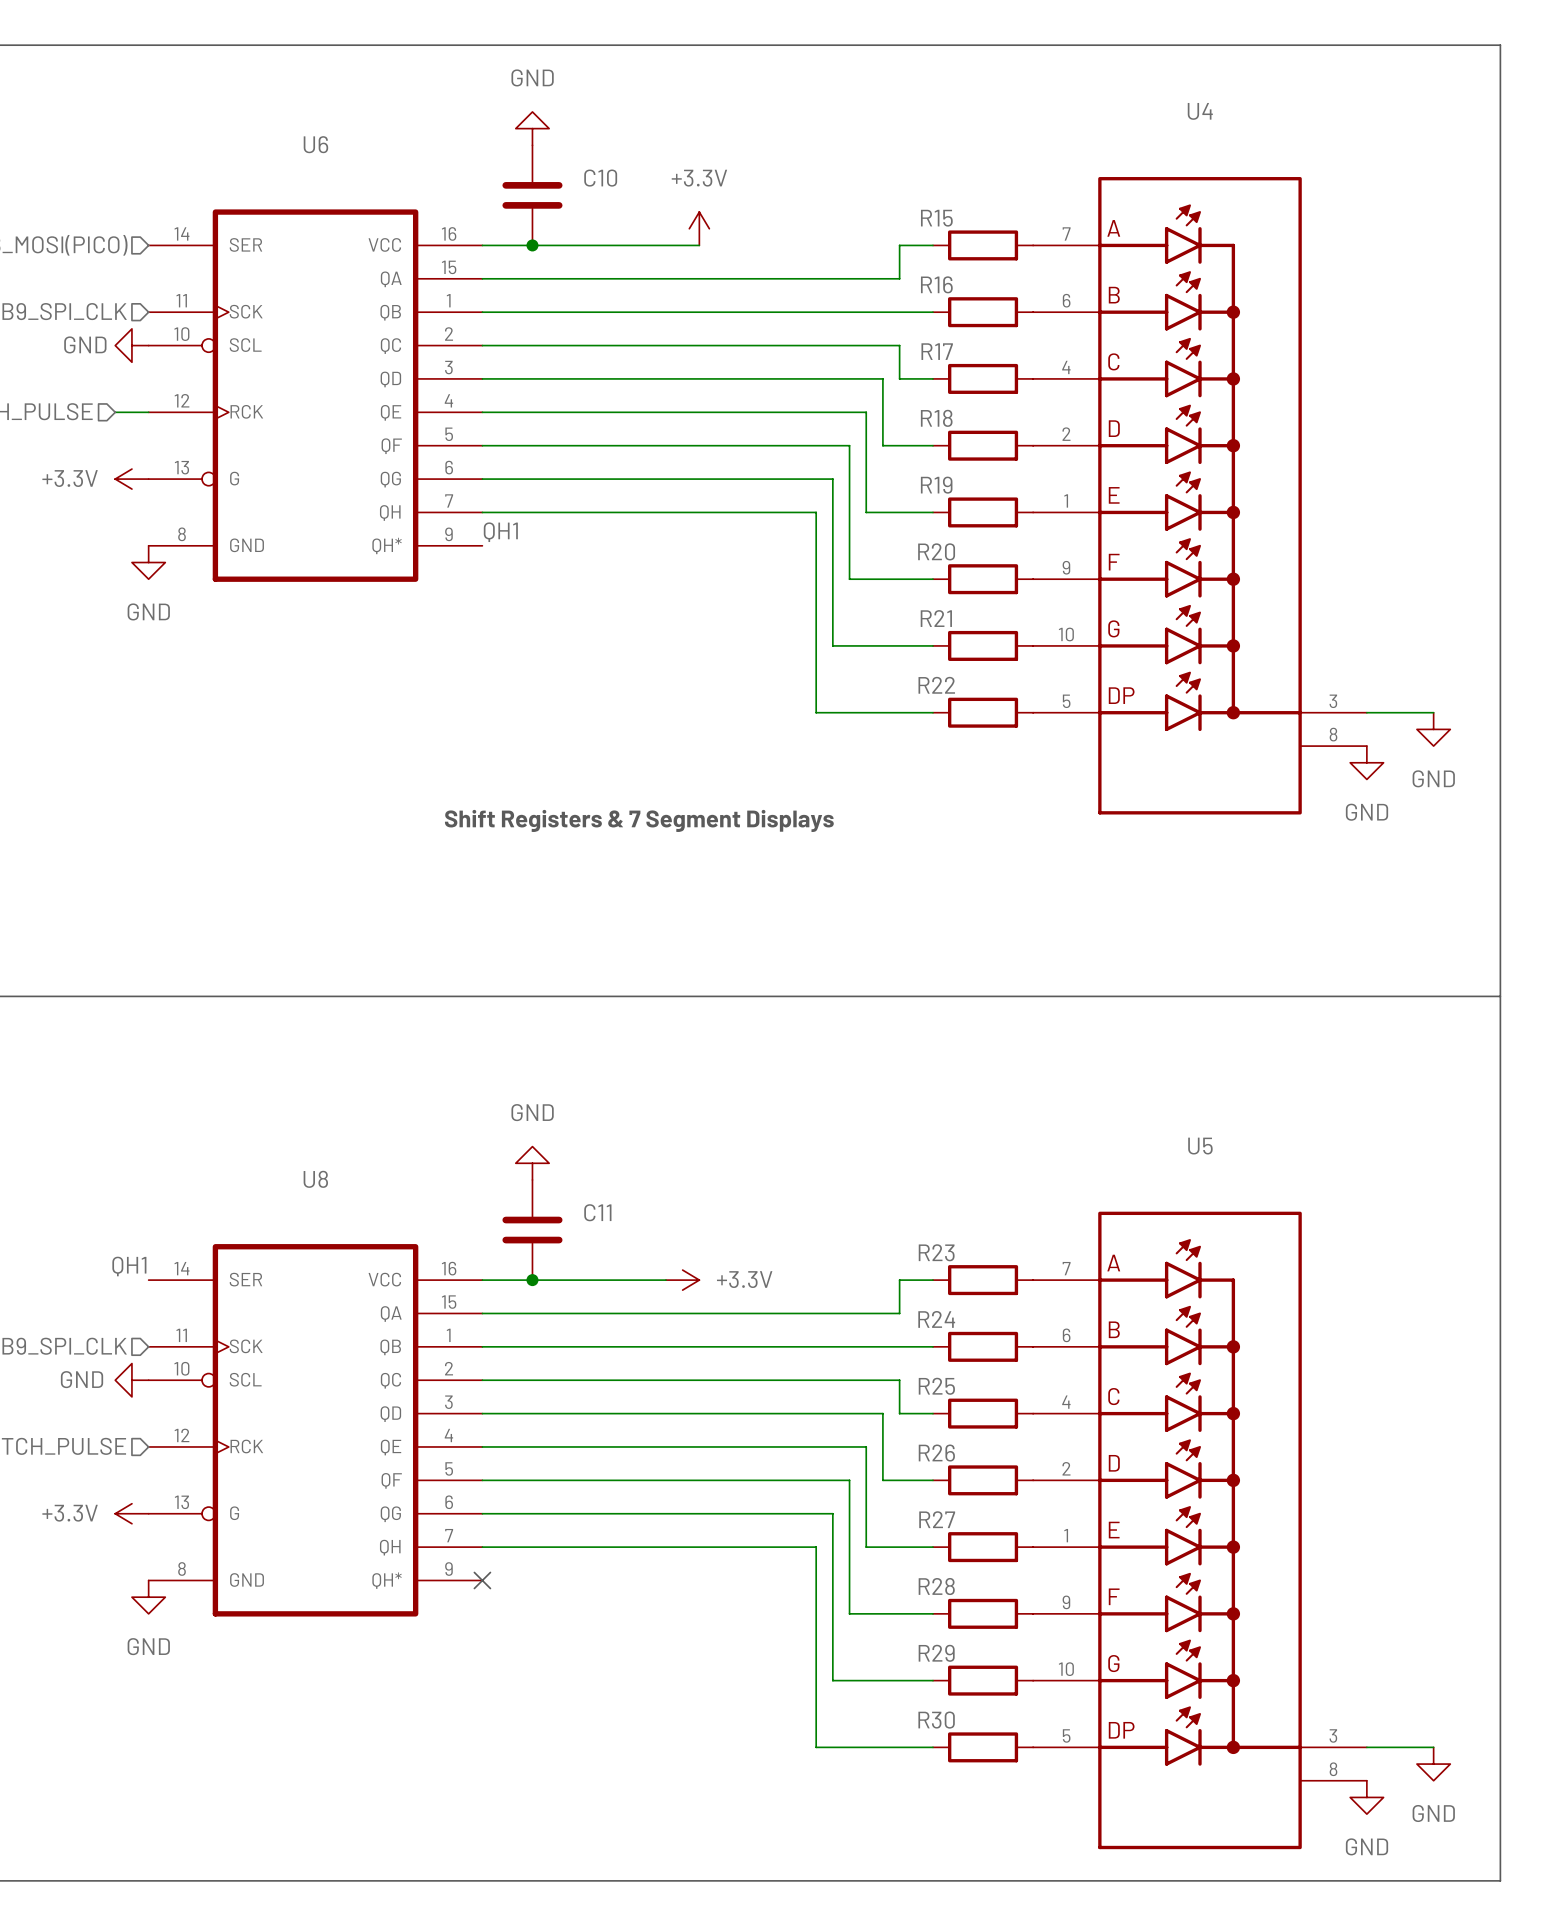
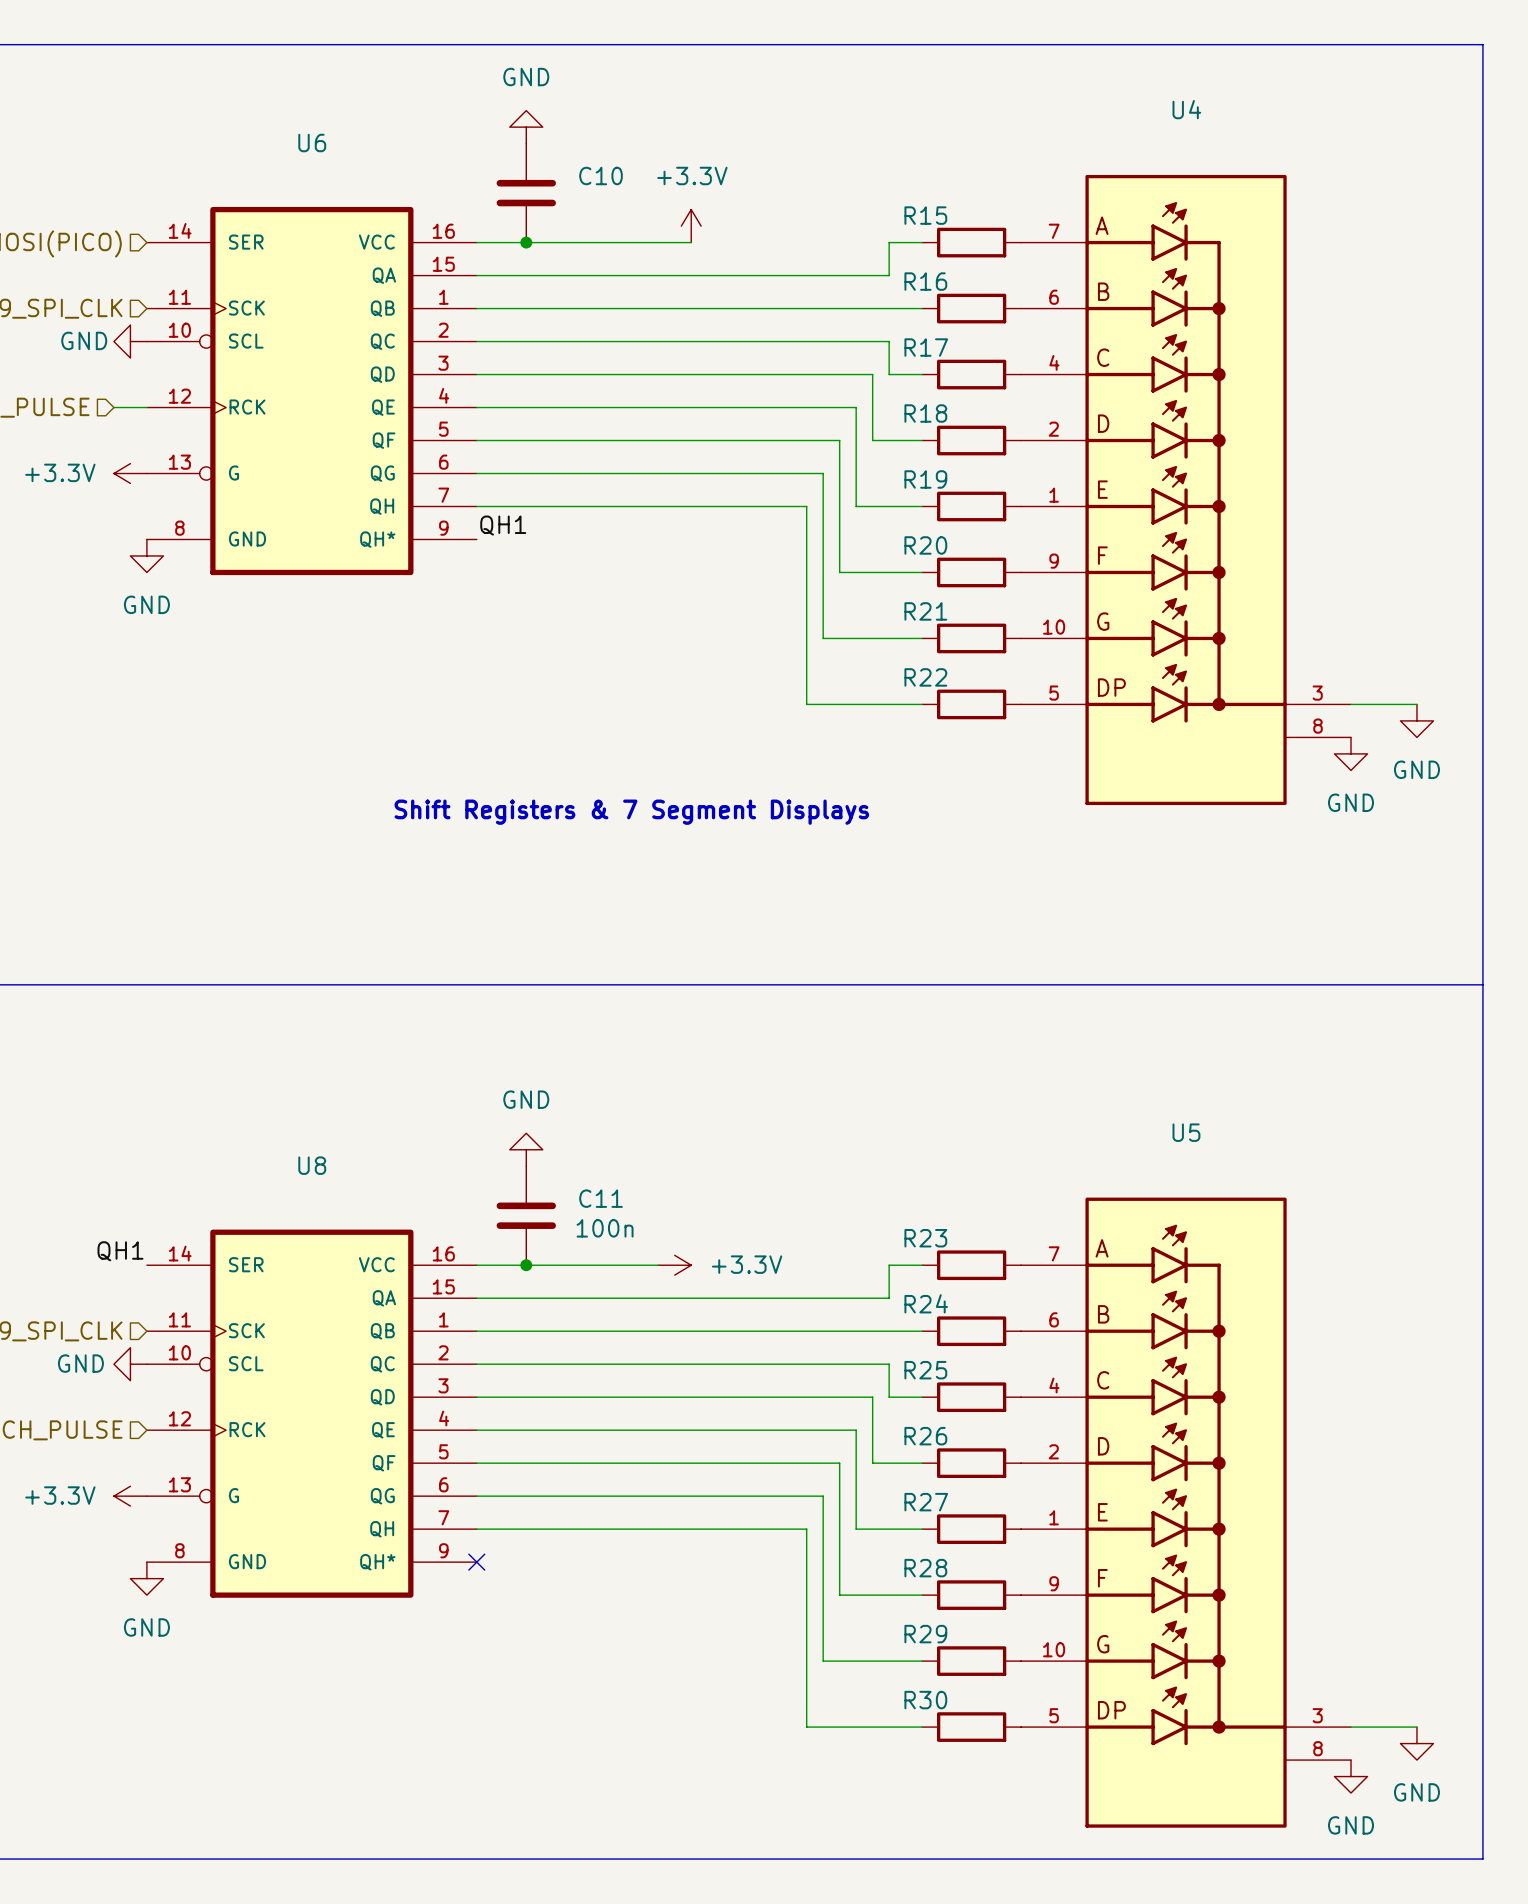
C11 value: none -> 100n (605, 1228)

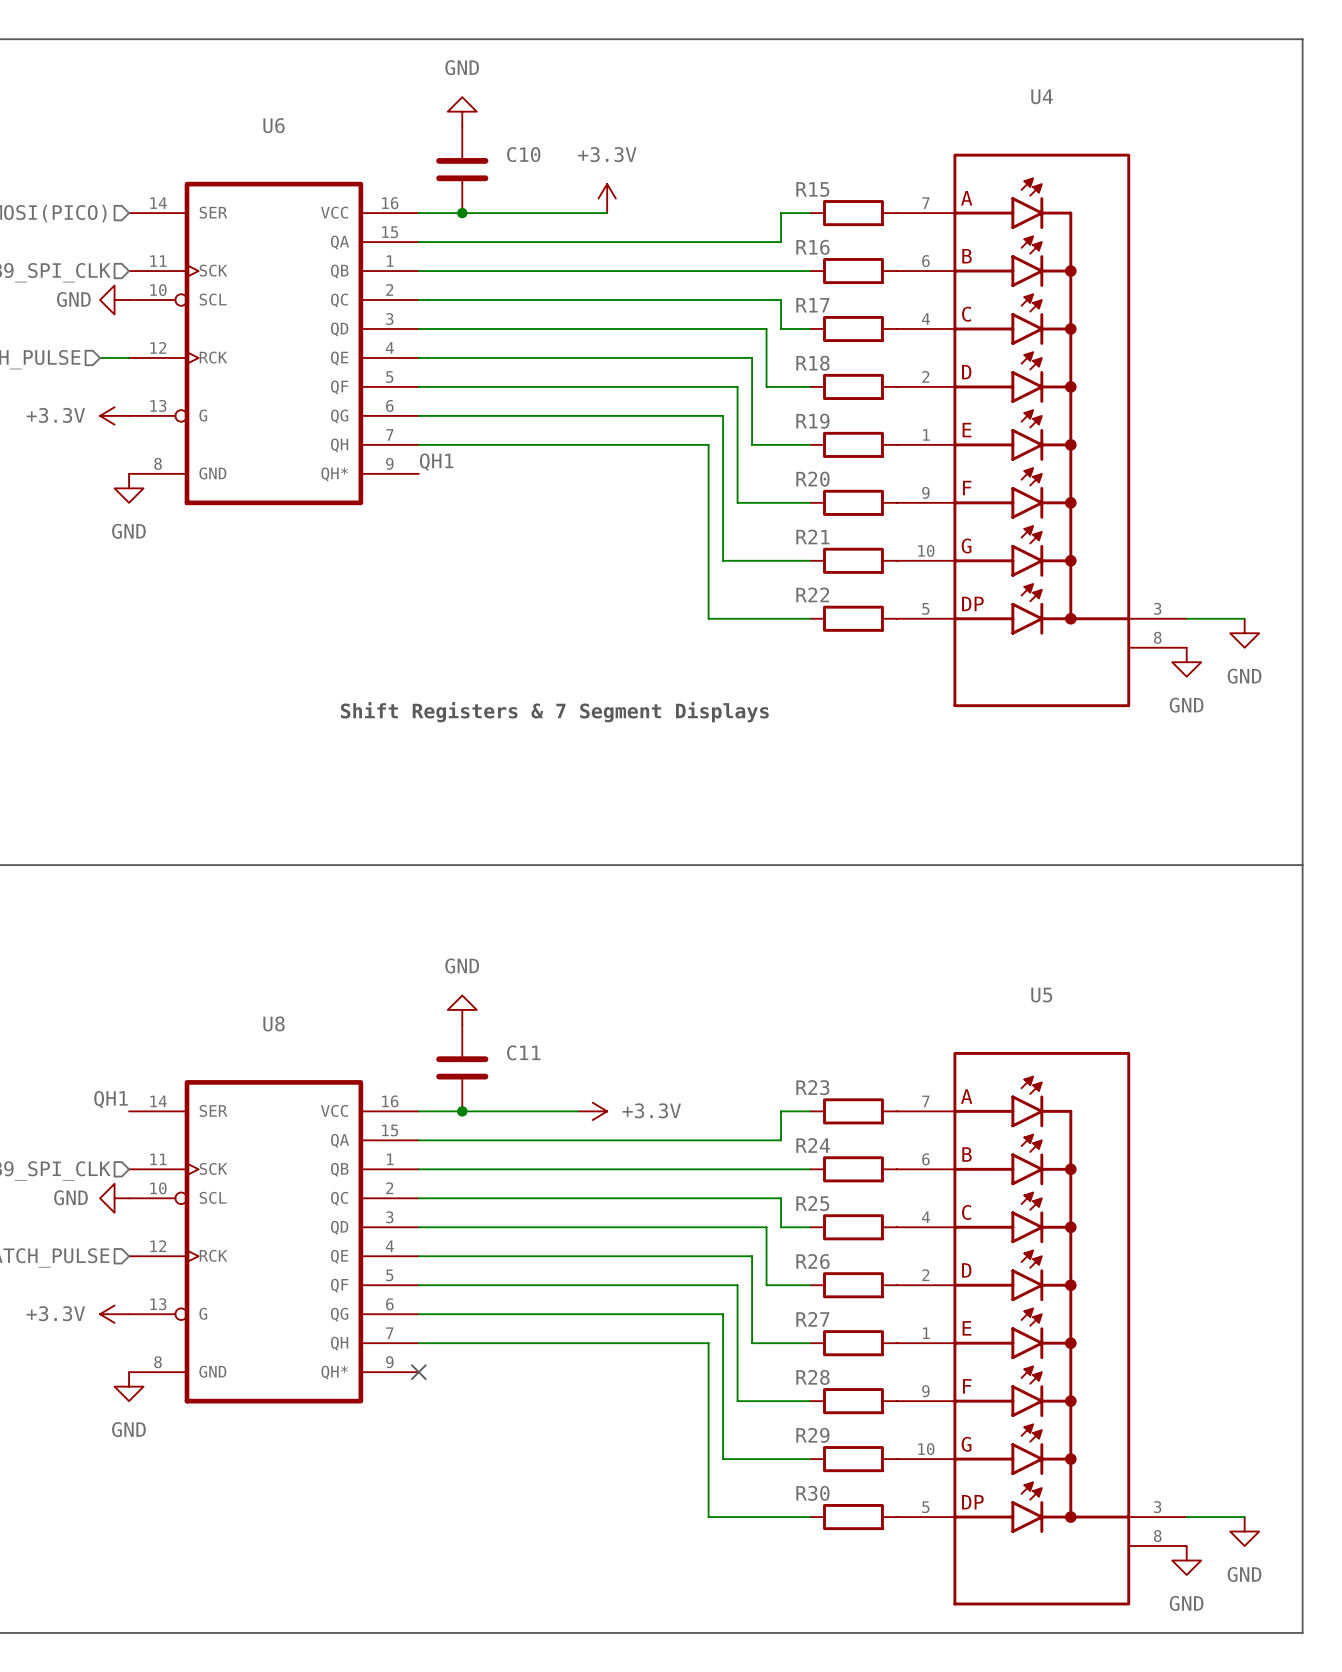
C11 value: 100n (605, 1228) -> none

